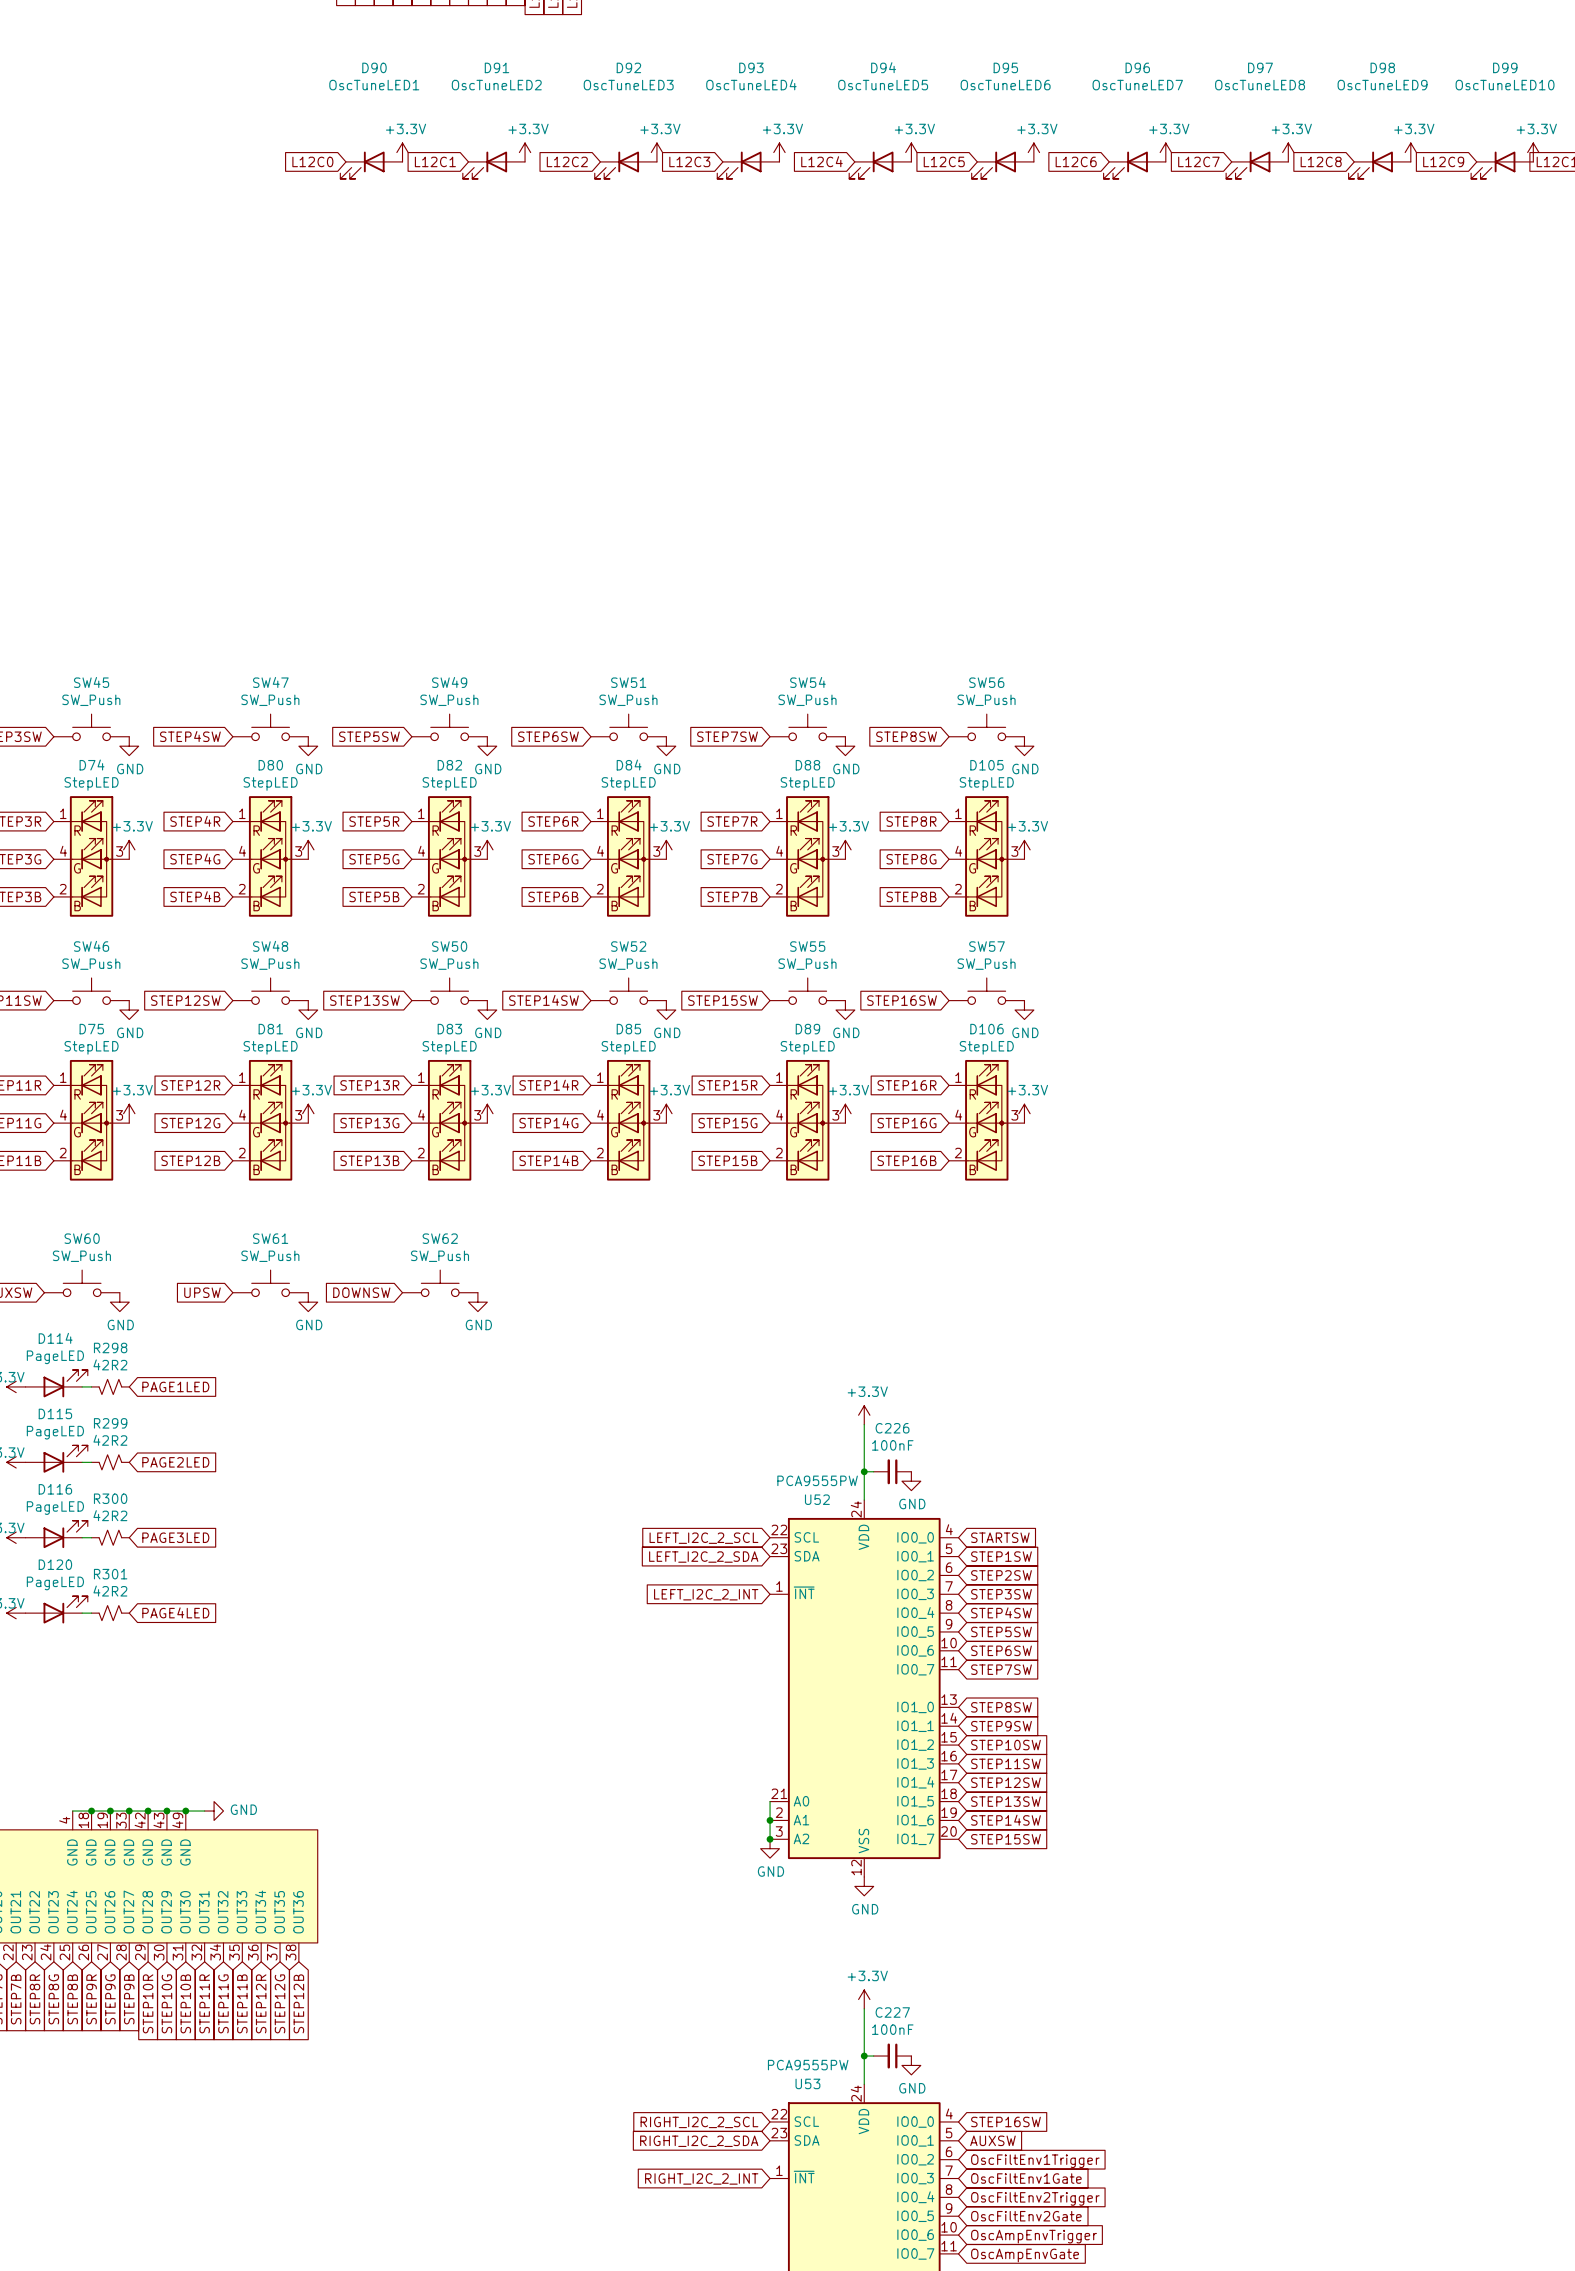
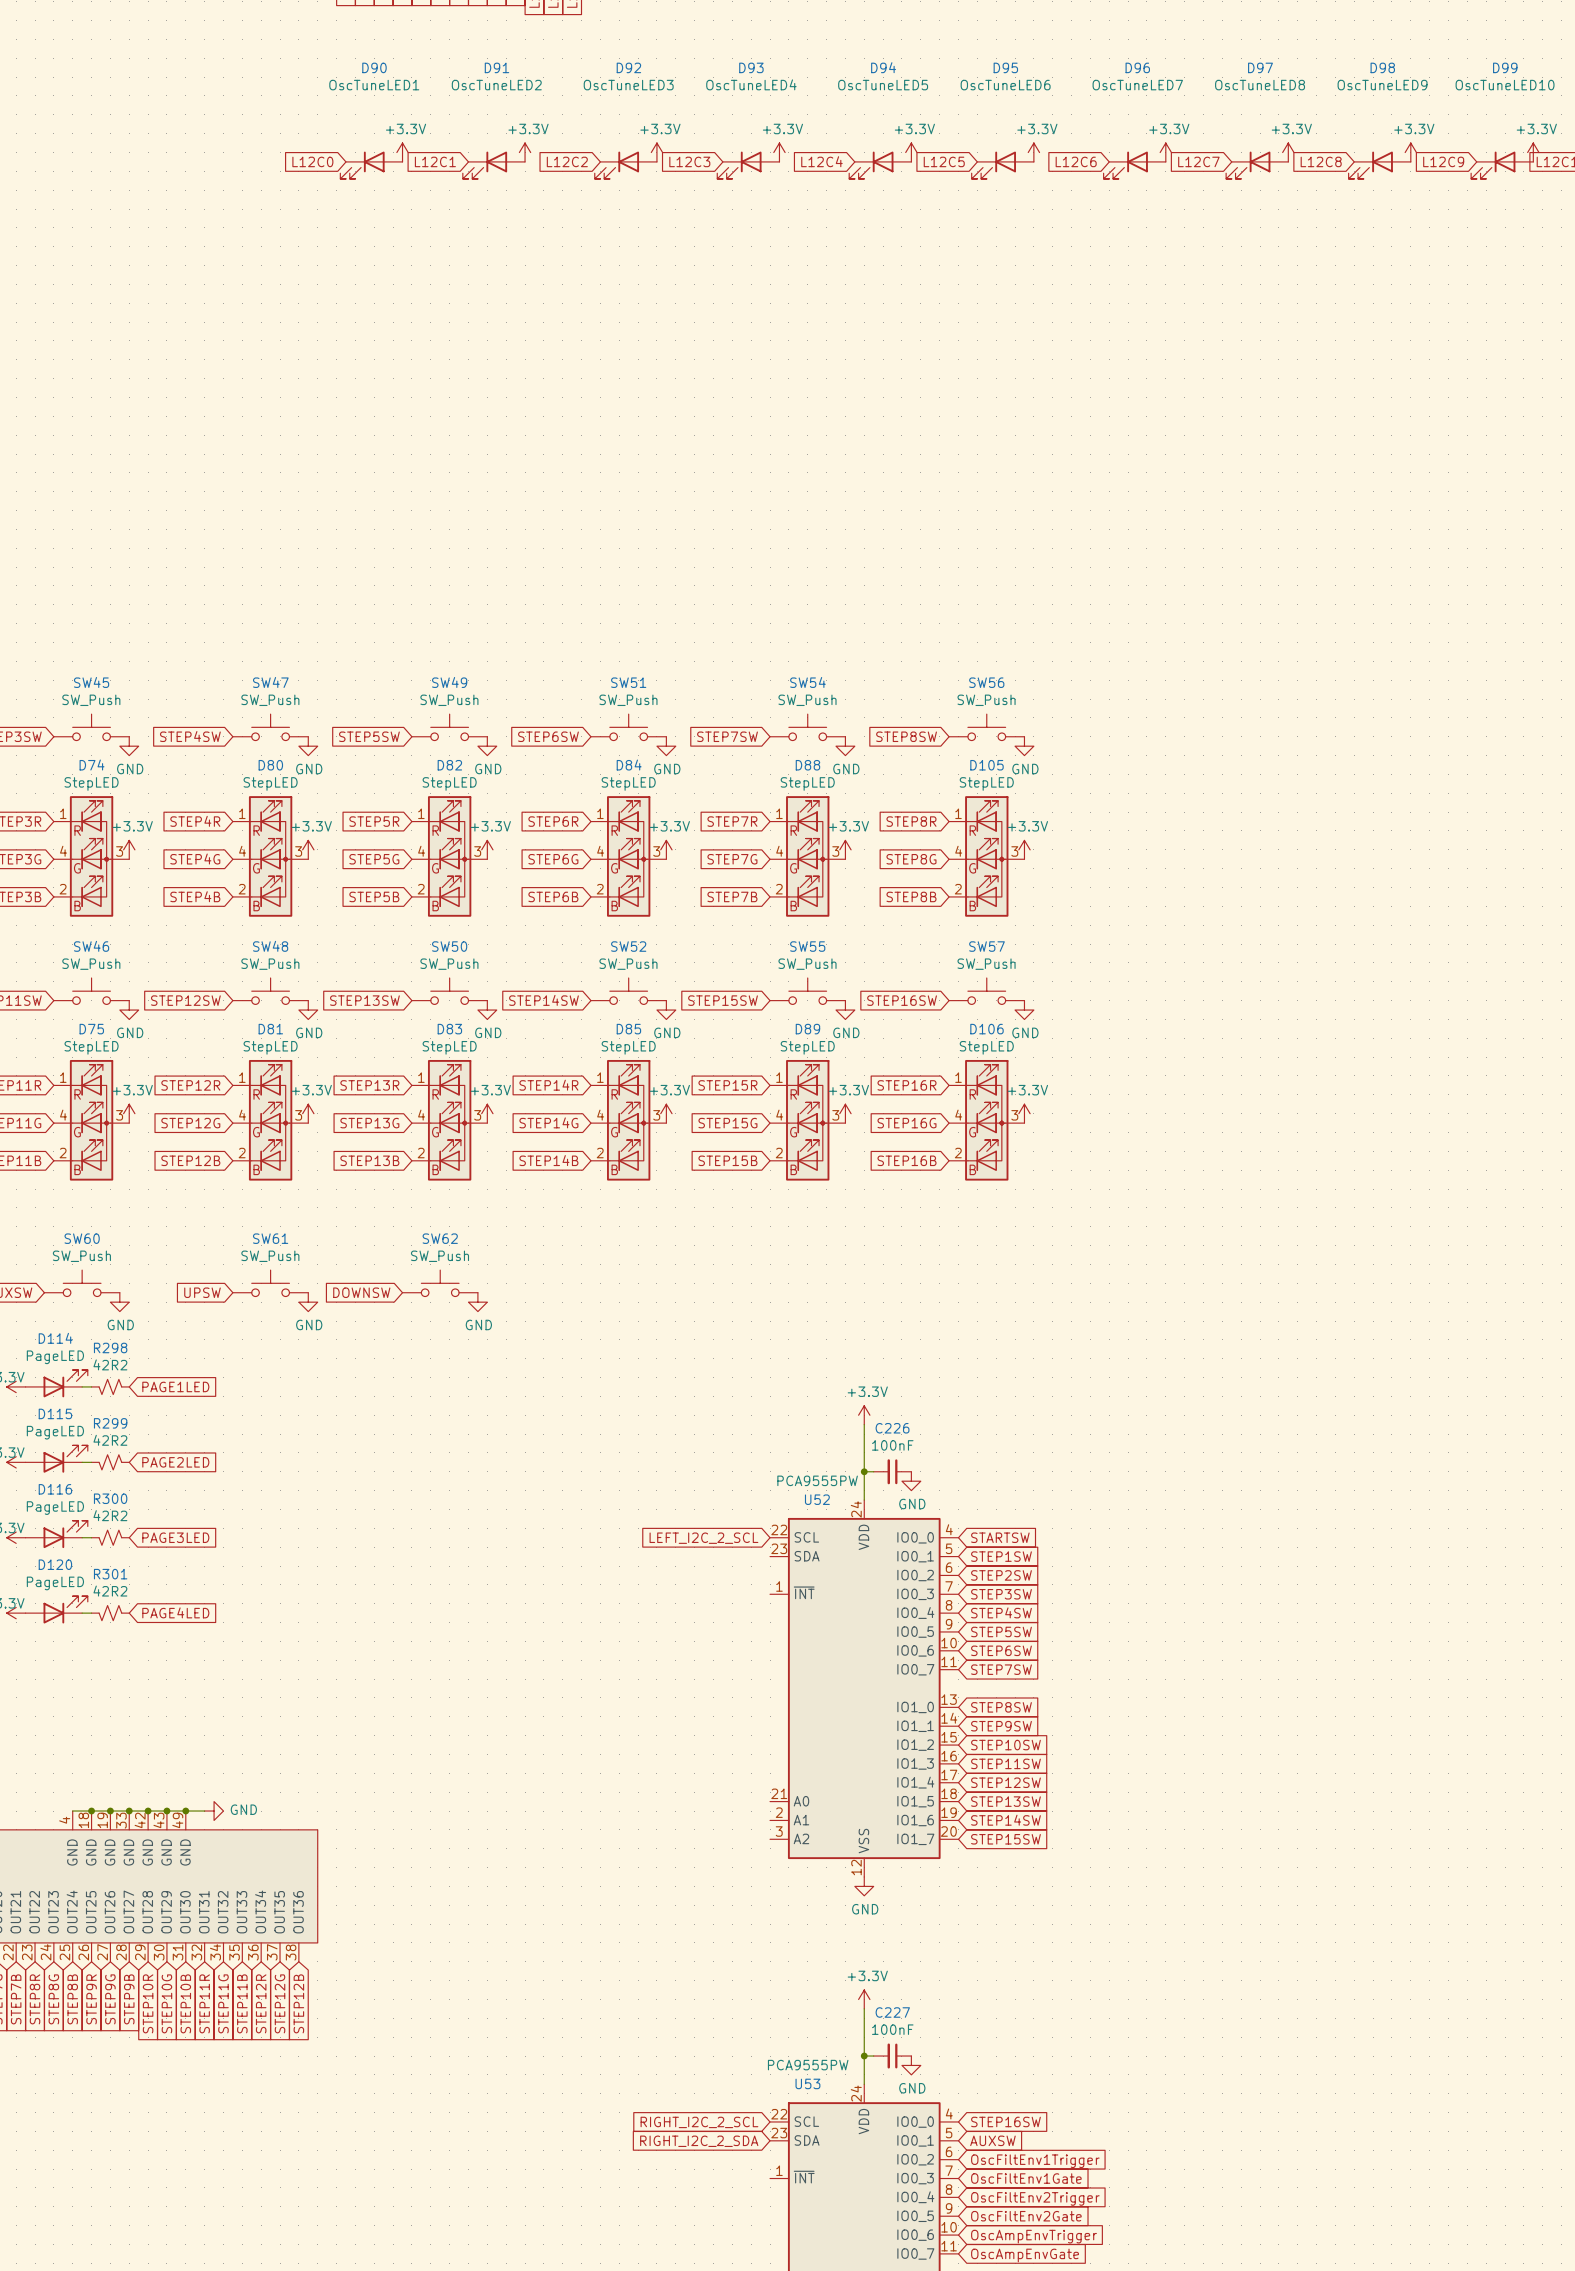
global label: LEFT_I2C_2_SDA (703, 1557) -> none
global label: LEFT_I2C_2_INT (706, 1594) -> none
wire: (770, 1801) (770, 1839) -> none
junction: (770, 1820) -> none
junction: (770, 1839) -> none
power symbol: GND (770, 1848) -> none
global label: RIGHT_I2C_2_INT (701, 2178) -> none

